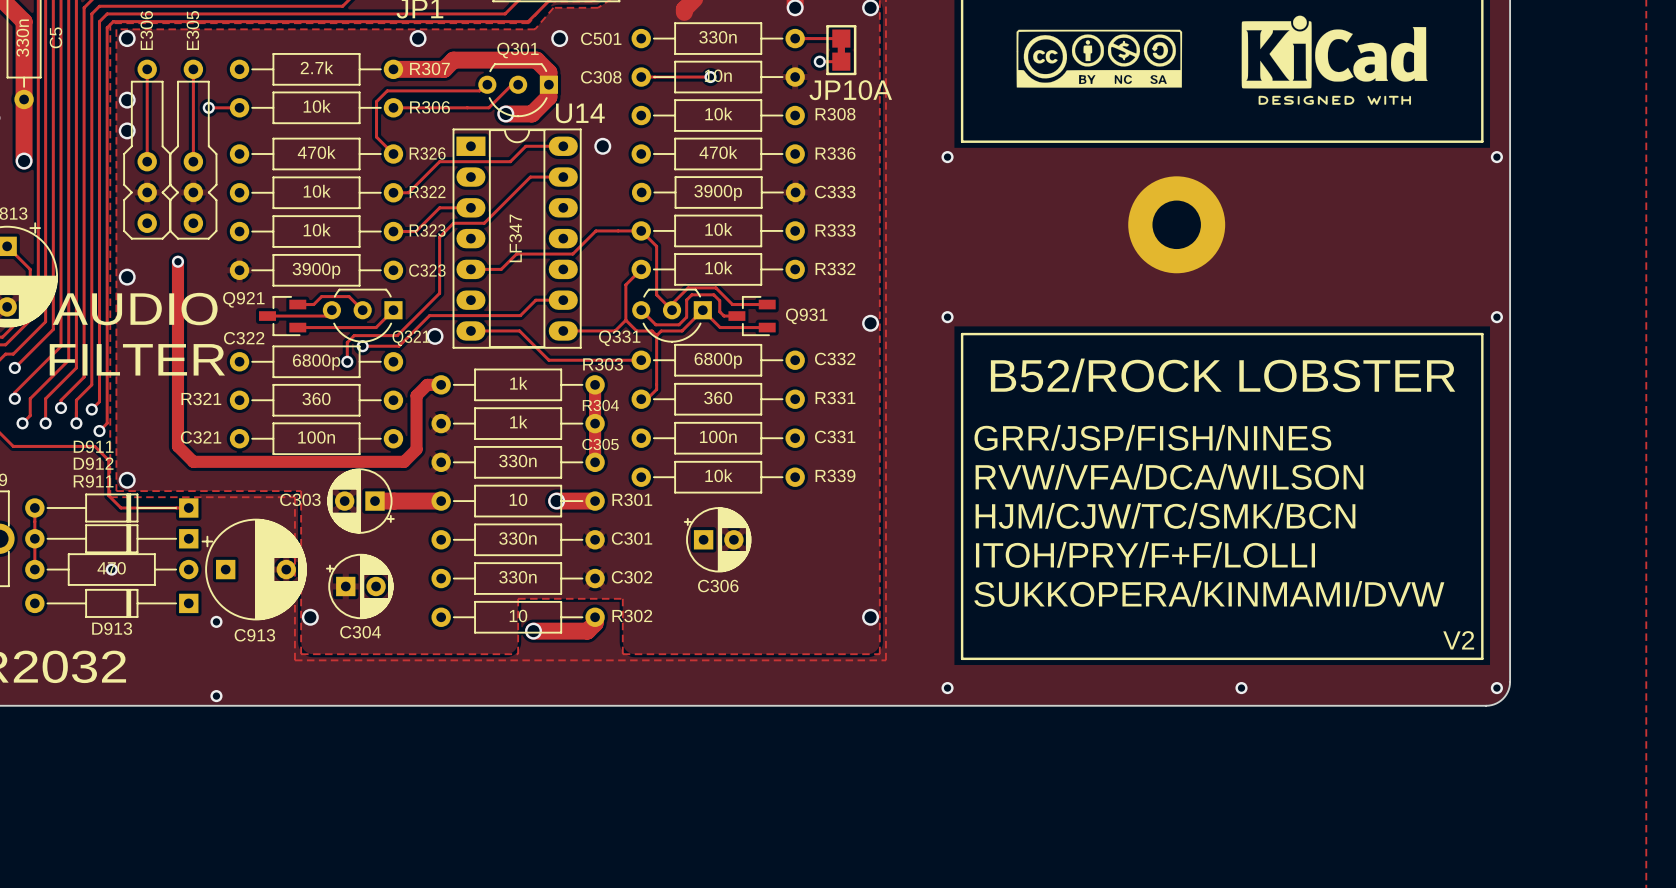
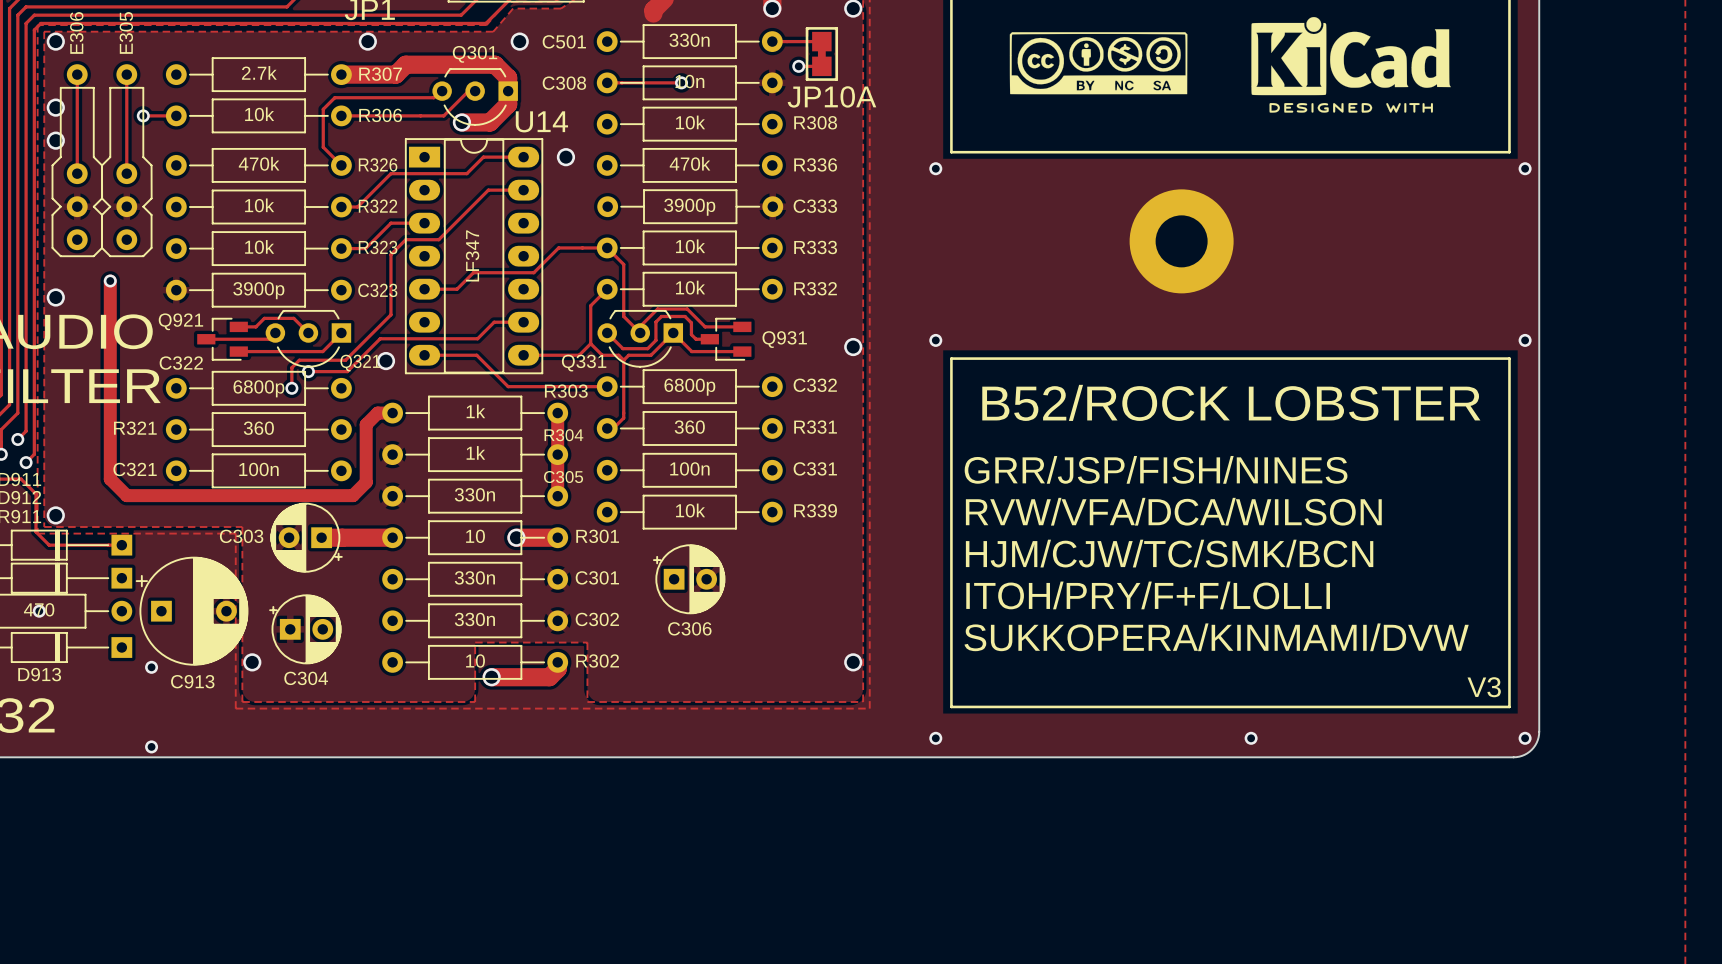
text: V2 (1458, 640) -> V3 (1484, 687)

